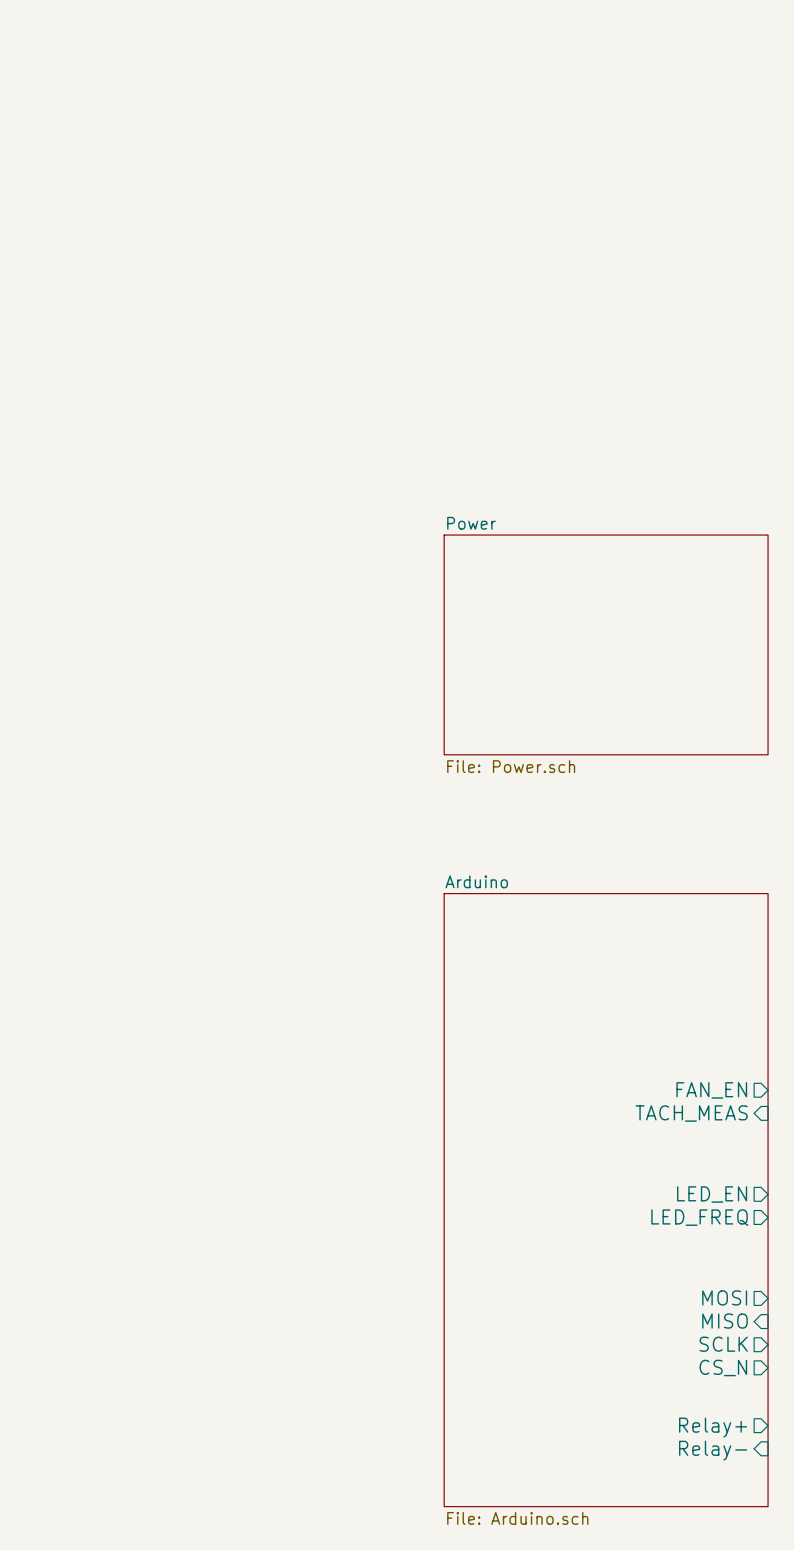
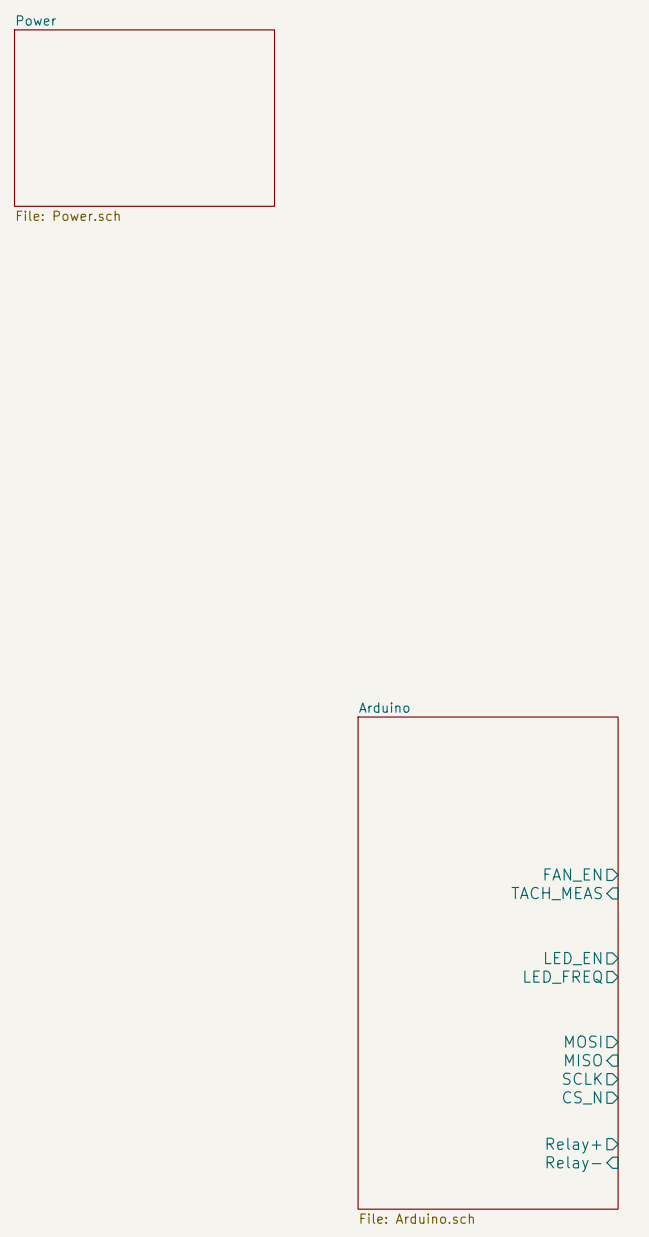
sheet Power: none -> File: Power.sch (144, 118)
sheet Power: File: Power.sch (606, 644) -> none

